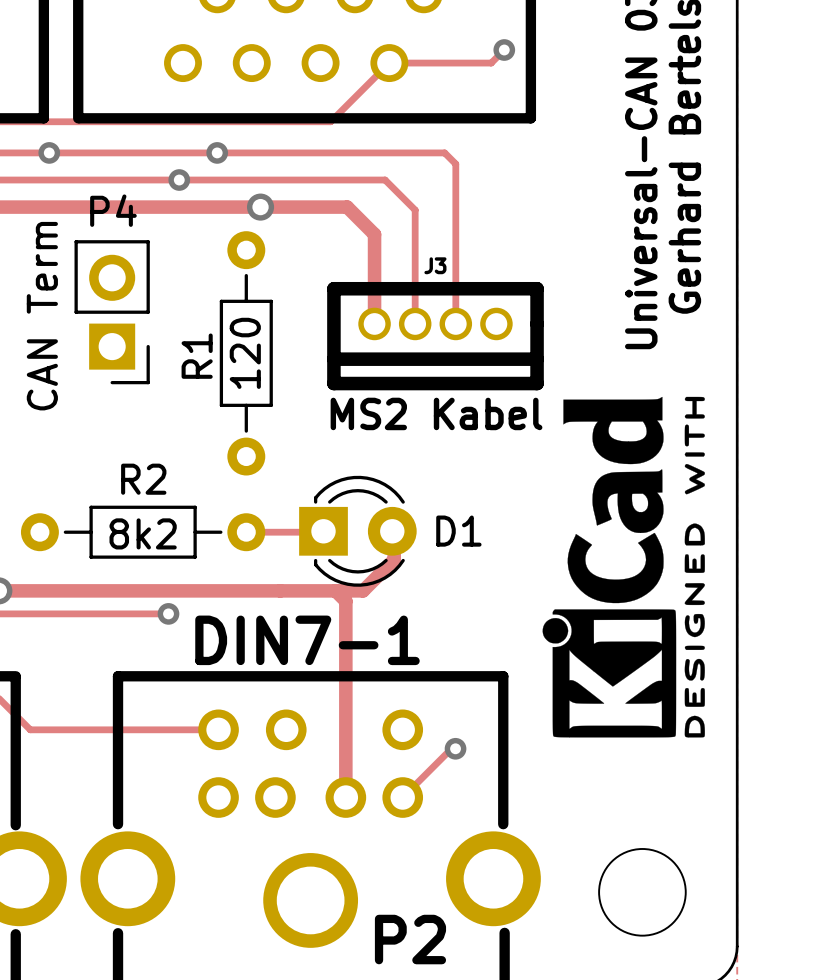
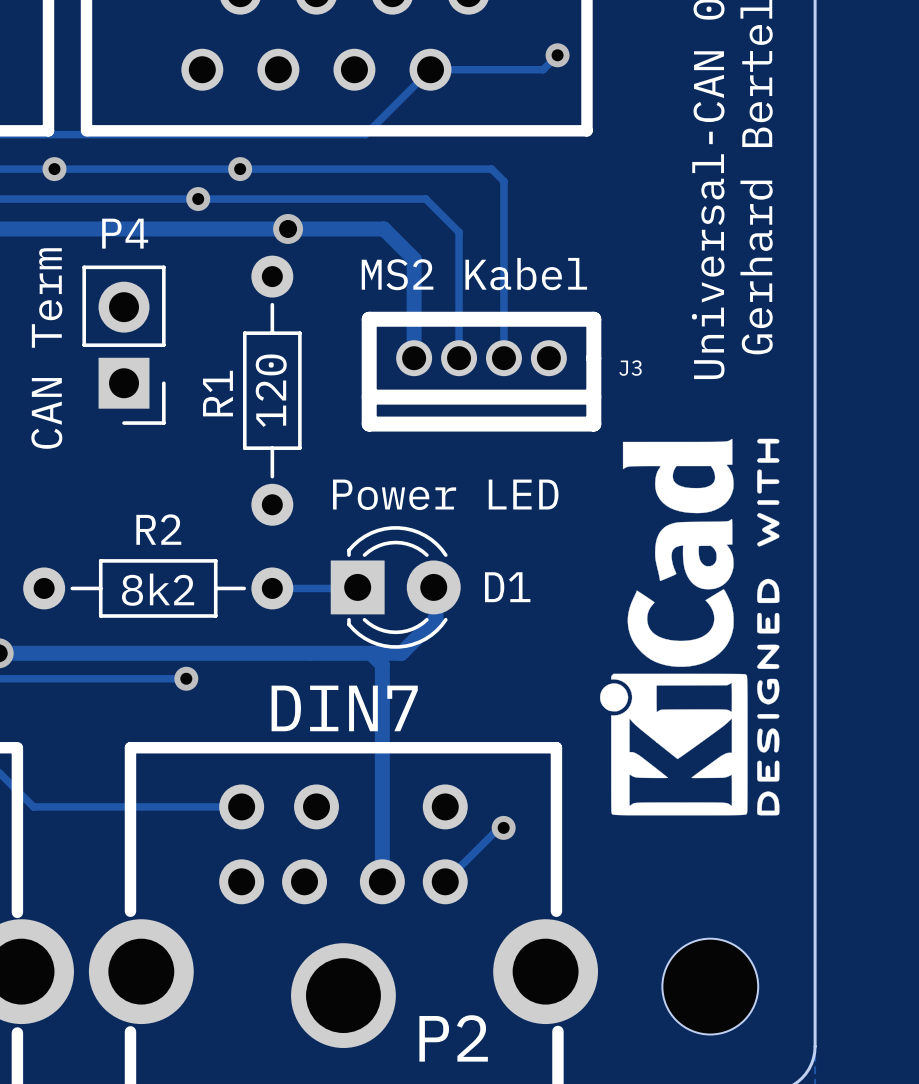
J3 name position: J3 (435, 265) -> J3 (630, 368)
J3 value position: MS2 Kabel (436, 413) -> MS2 Kabel (474, 274)
D1 value: none -> Power LED (445, 494)
P2 value: DIN7-1 (307, 640) -> DIN7 (344, 708)

